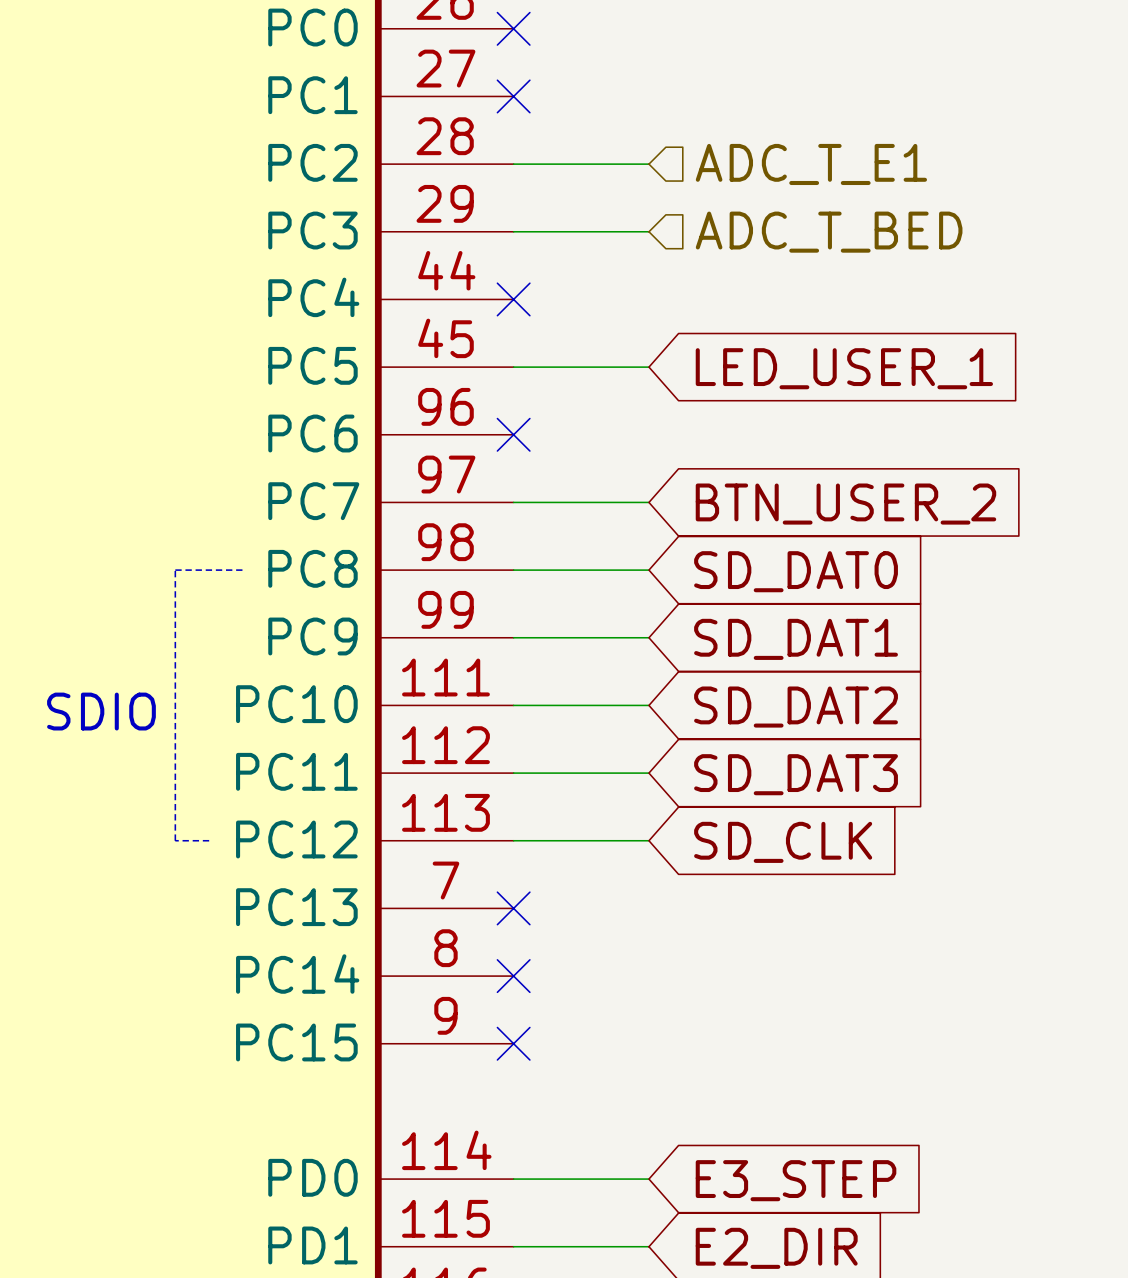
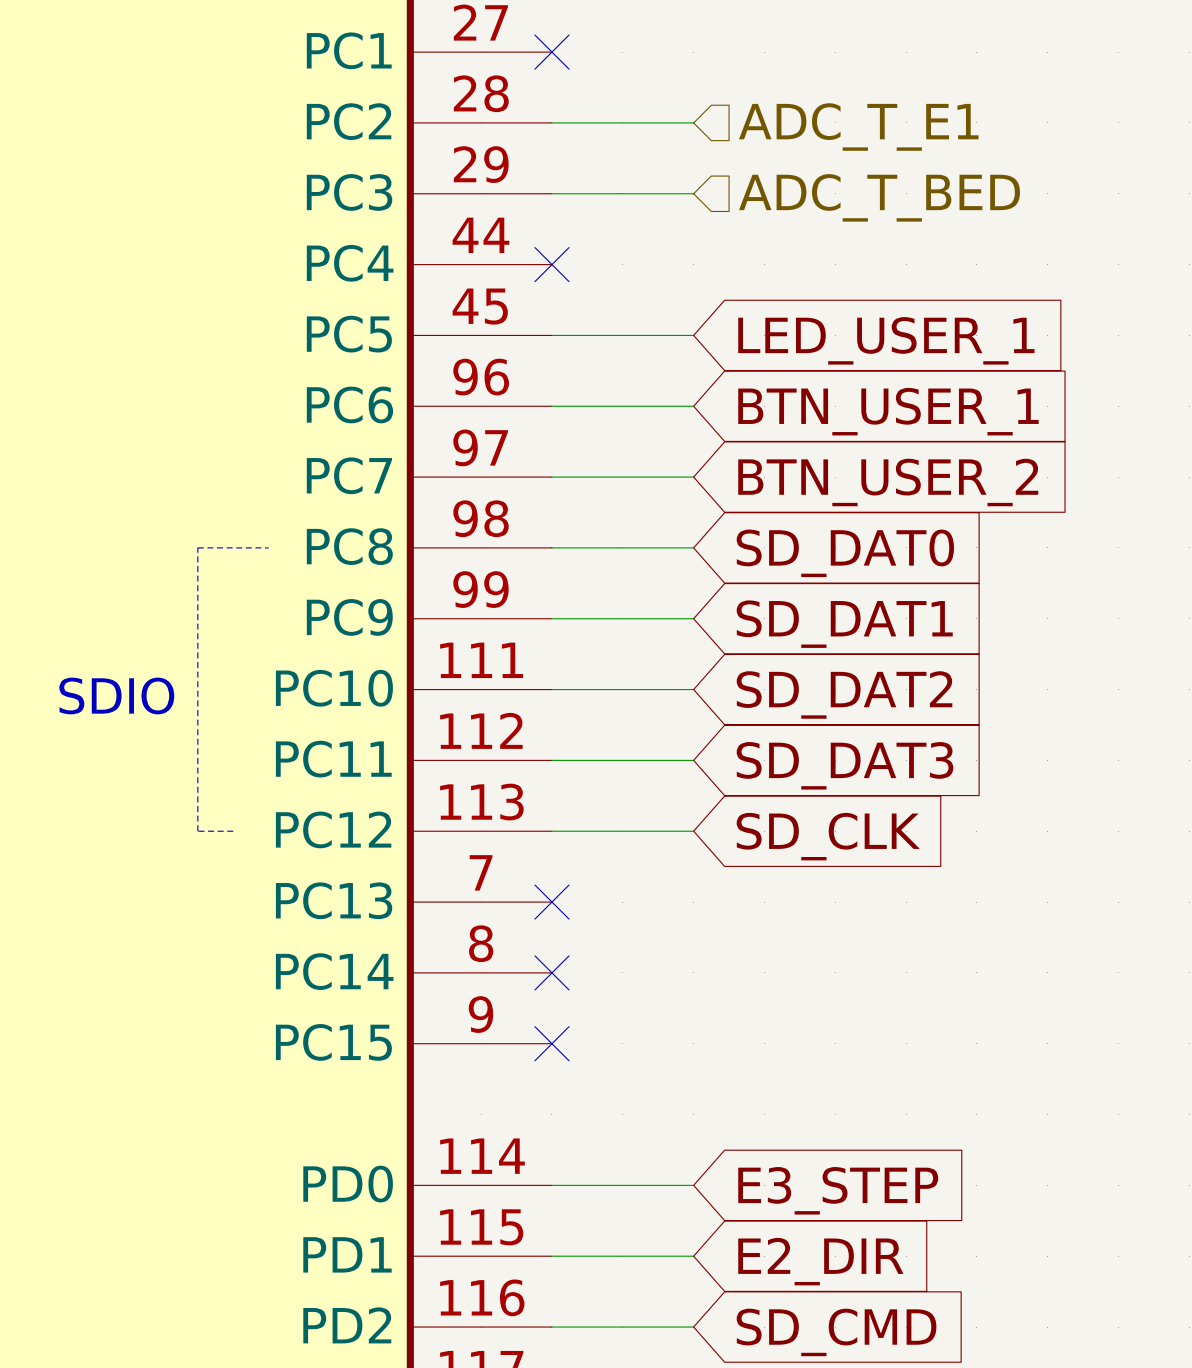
wire: none -> (551, 406) (693, 406)
no-connect mark: (513, 434) -> none
global label: none -> BTN_USER_1 (888, 411)

